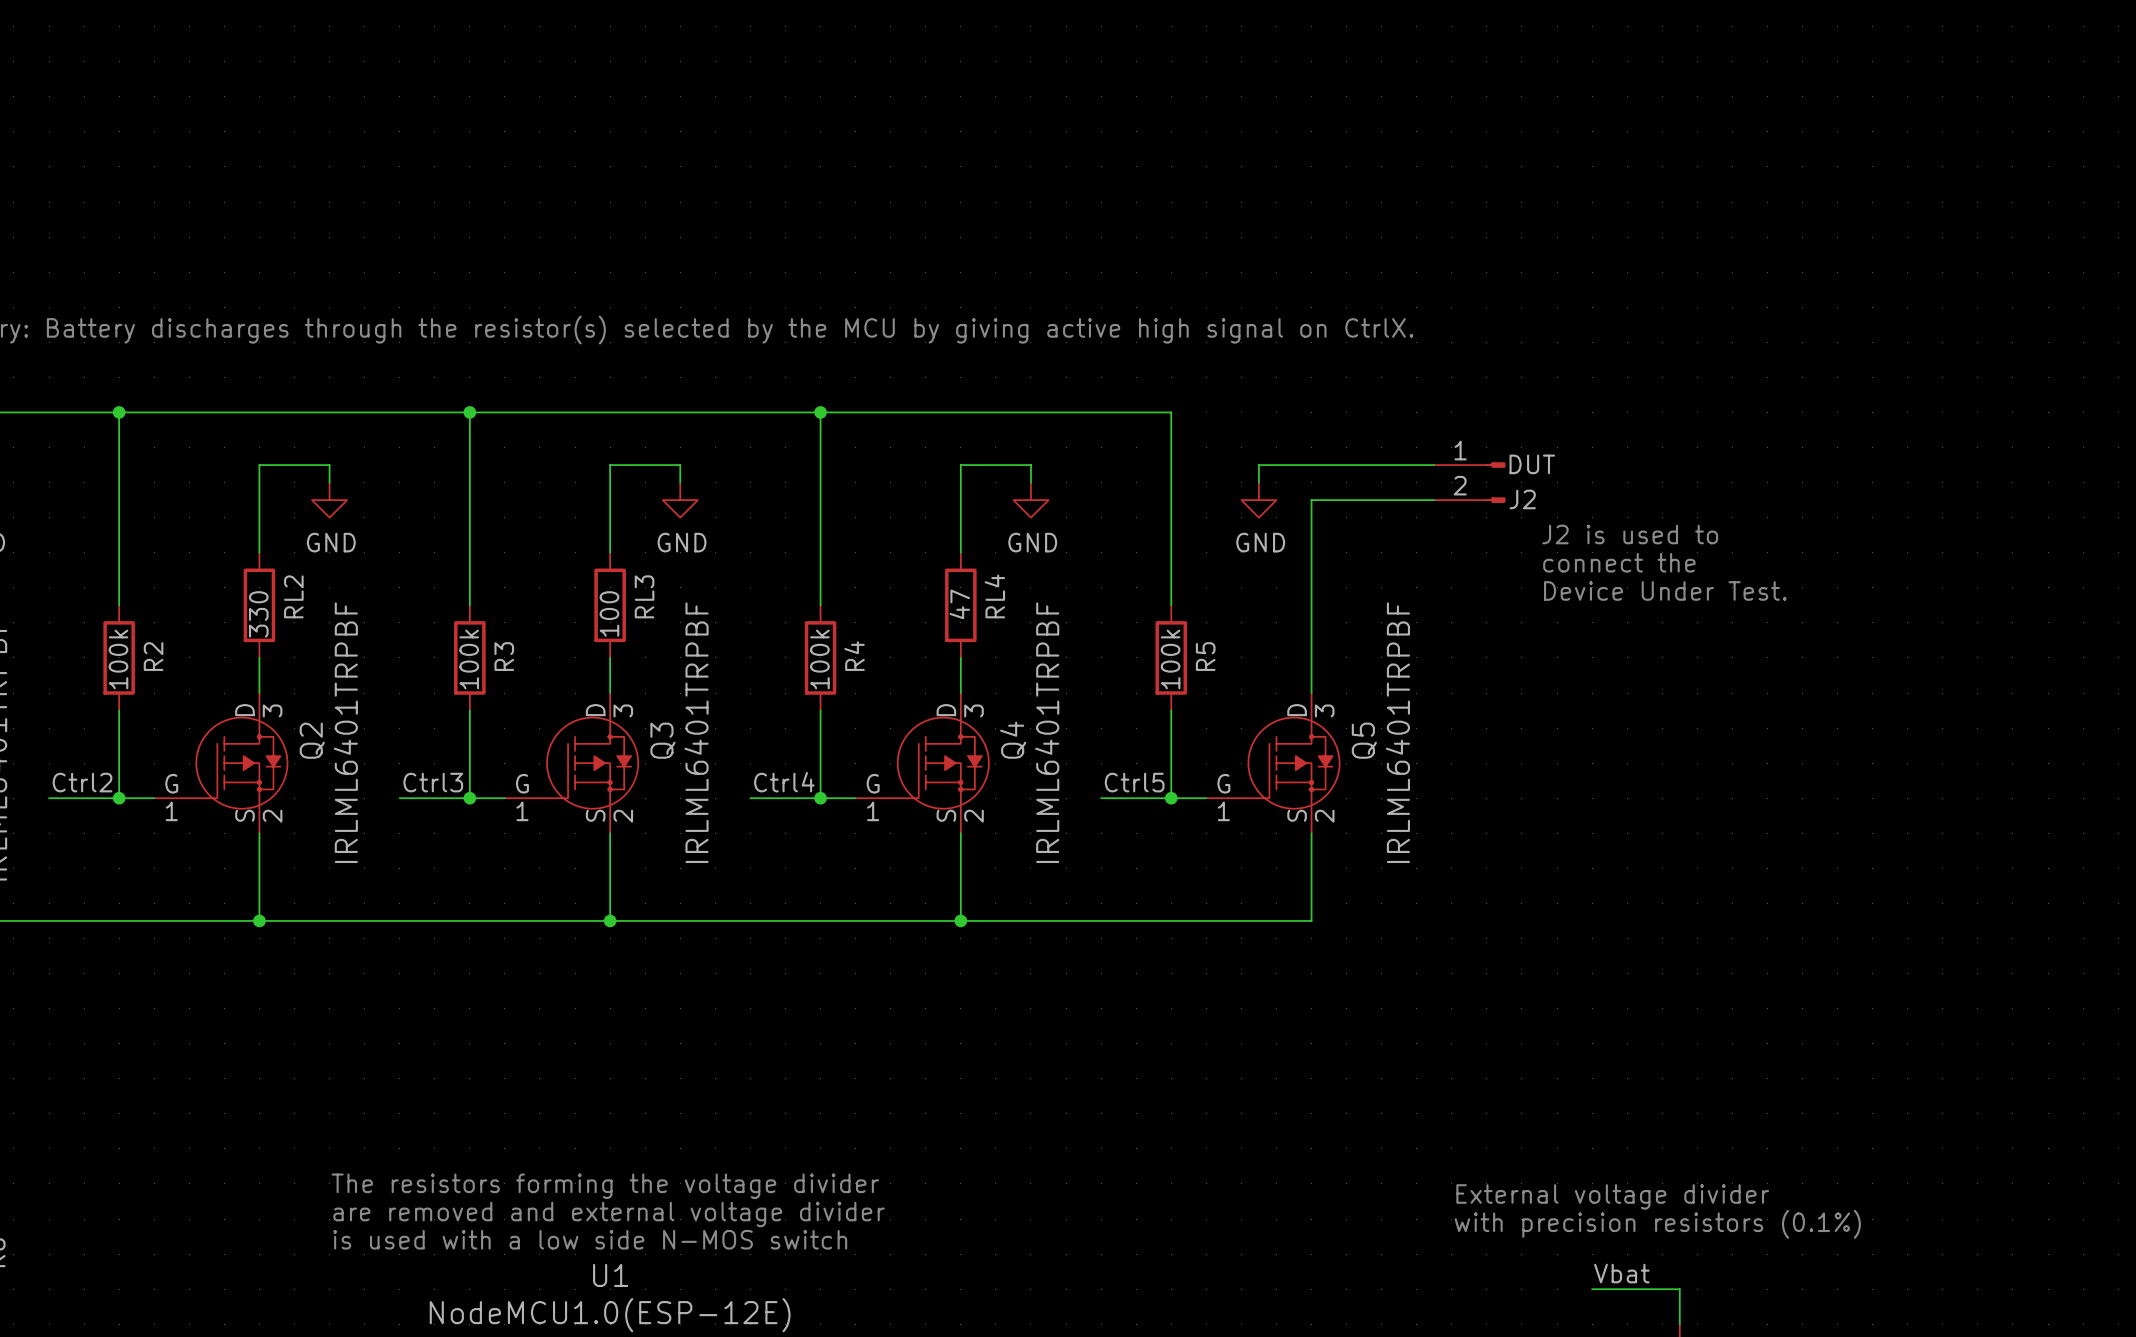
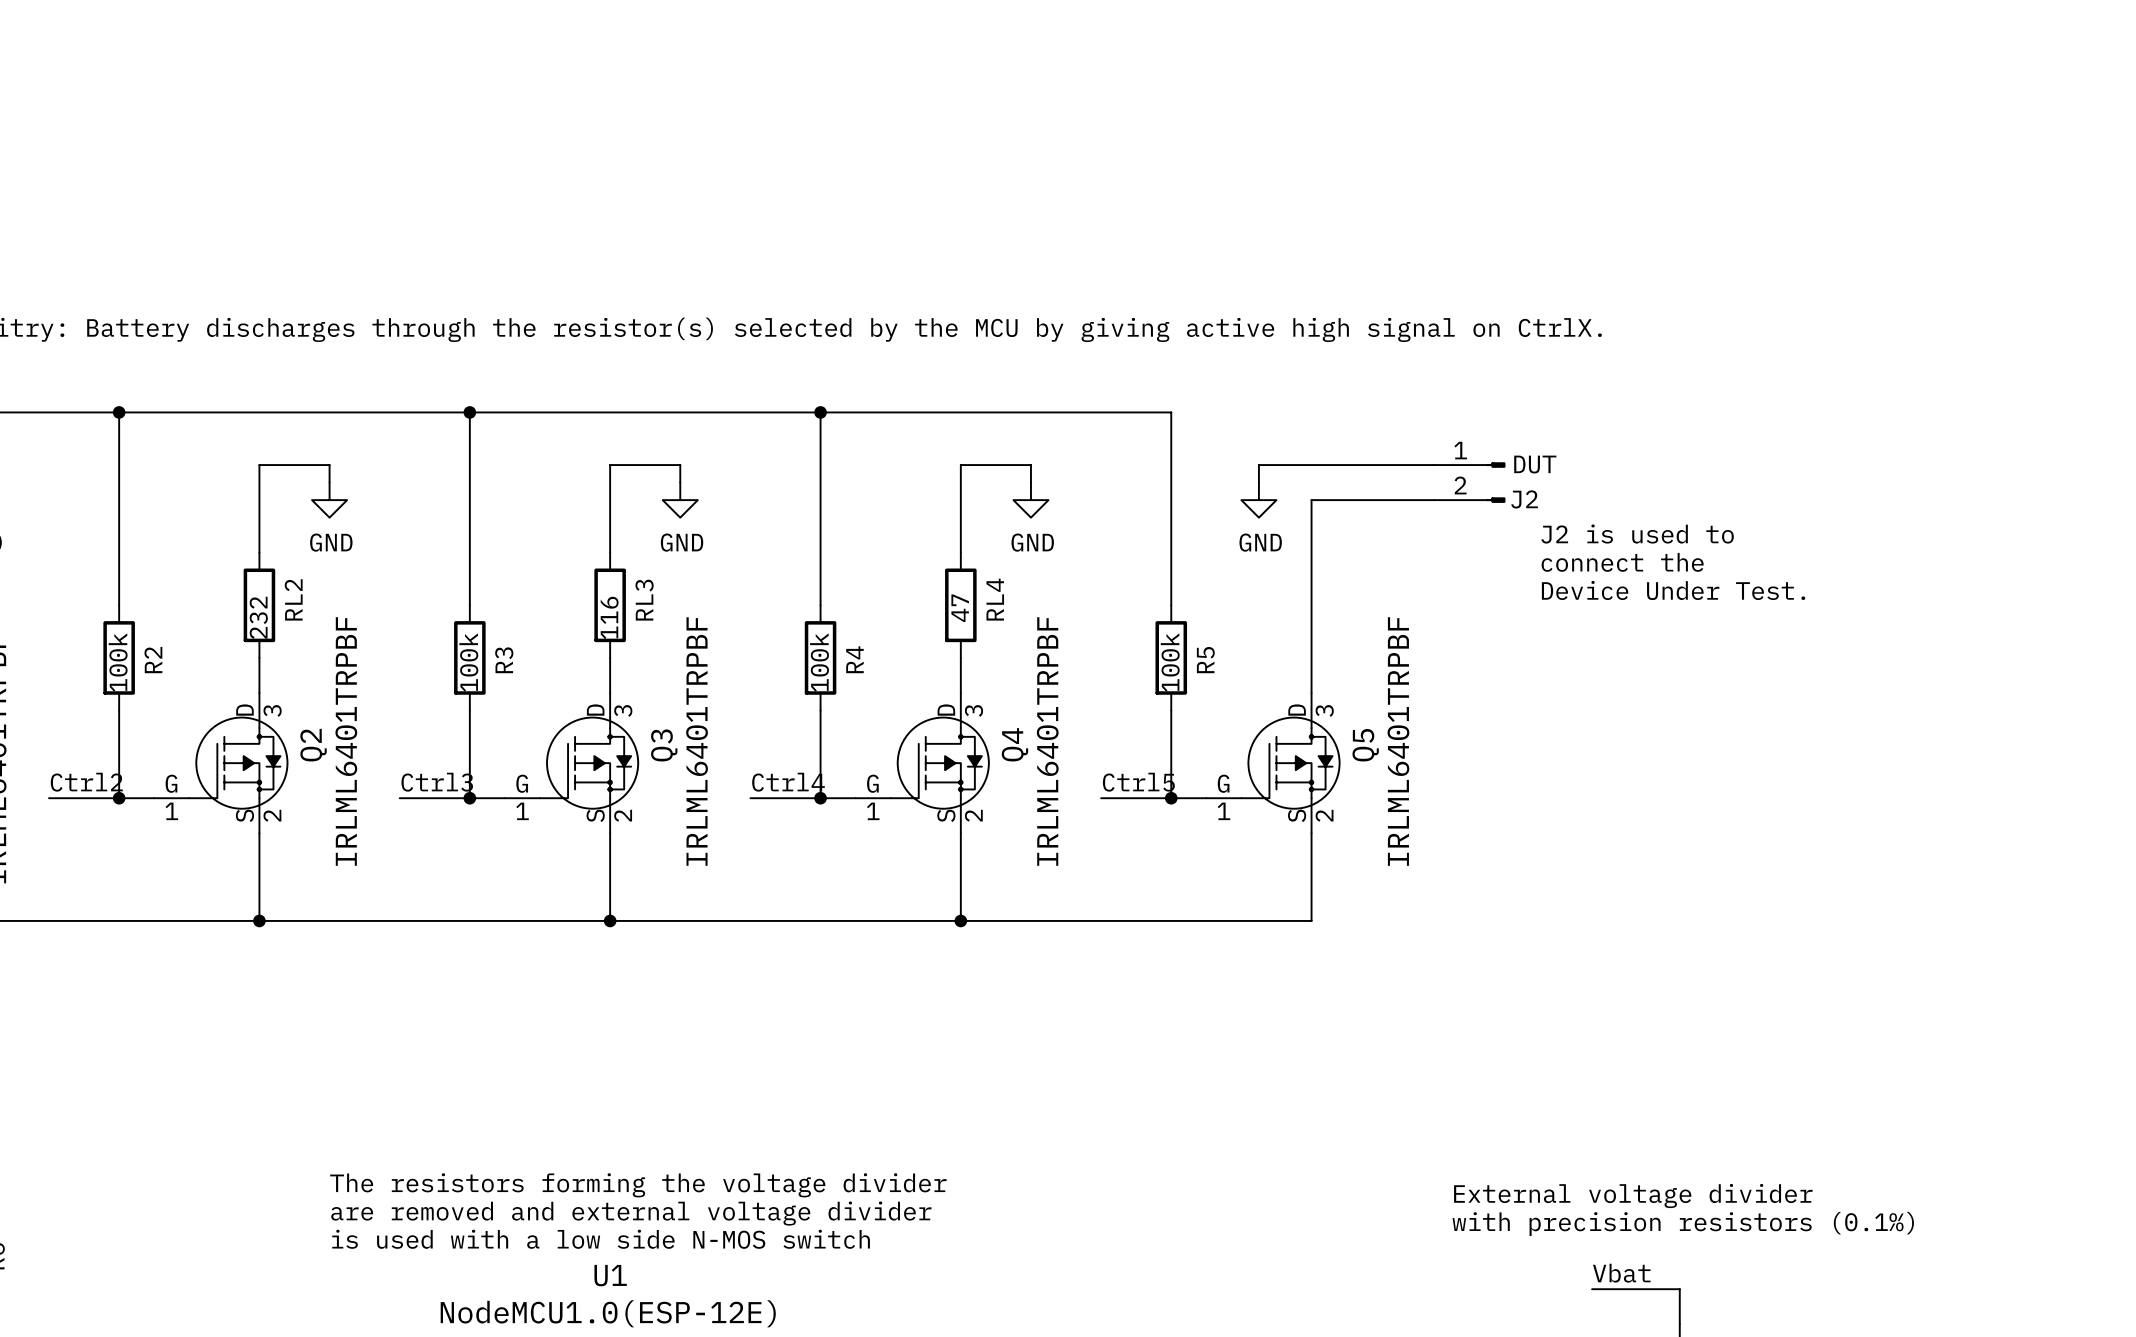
RL3 value: 100 (609, 613) -> 116 (609, 617)
RL2 value: 330 (258, 614) -> 232 (258, 617)

